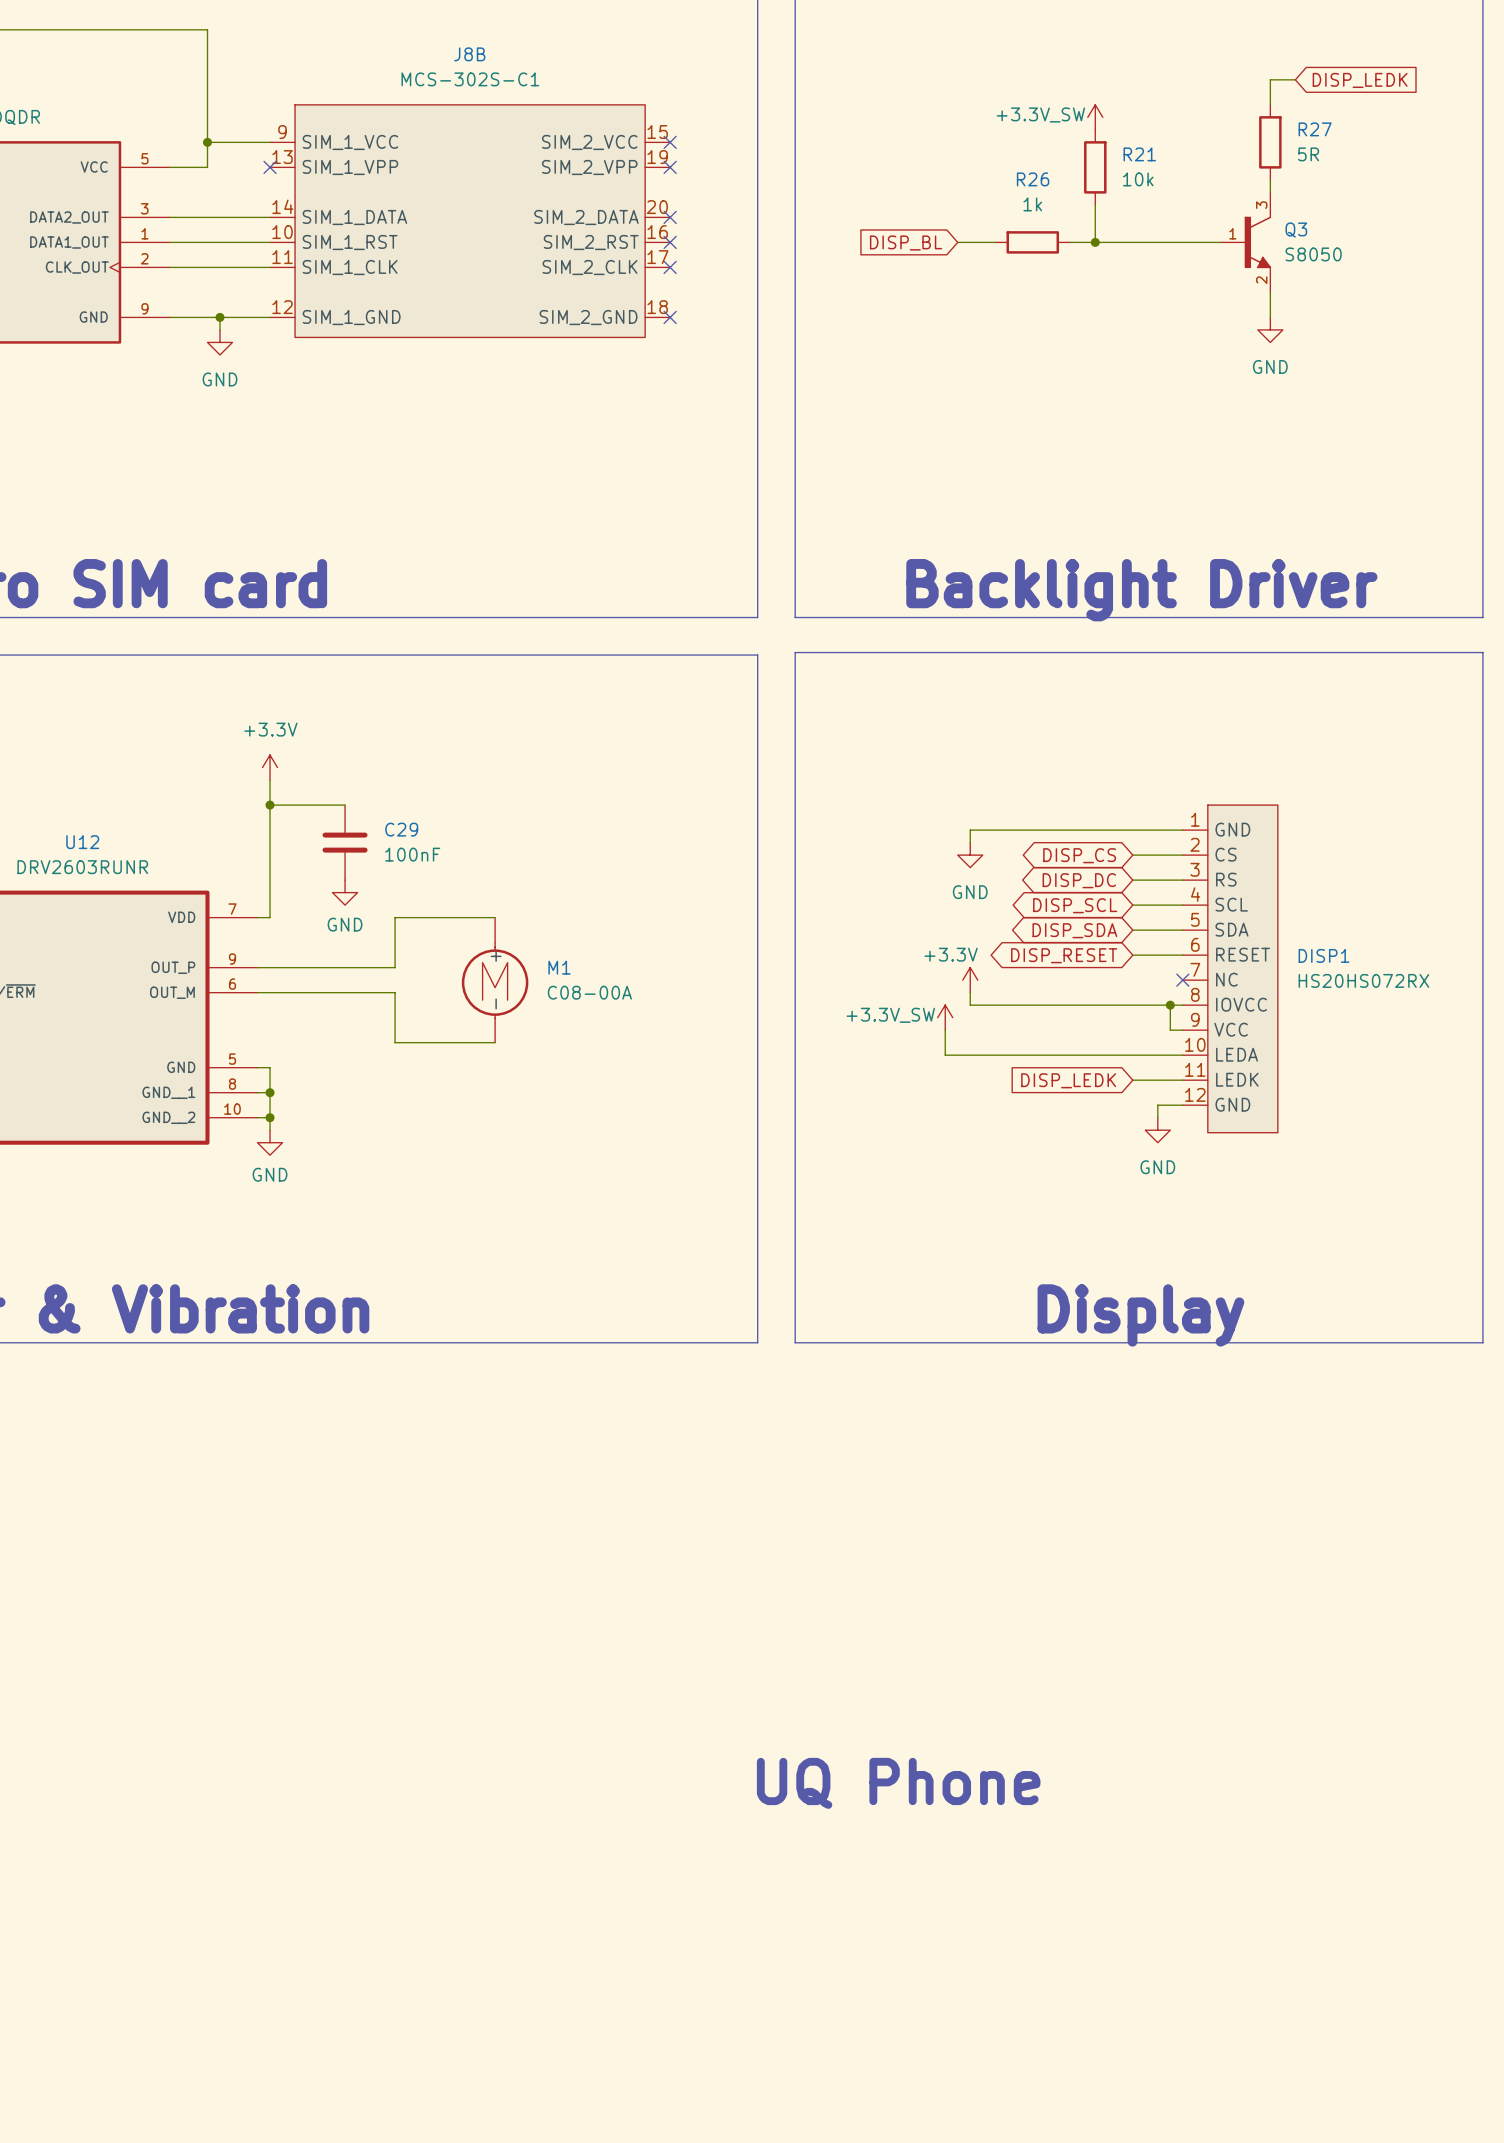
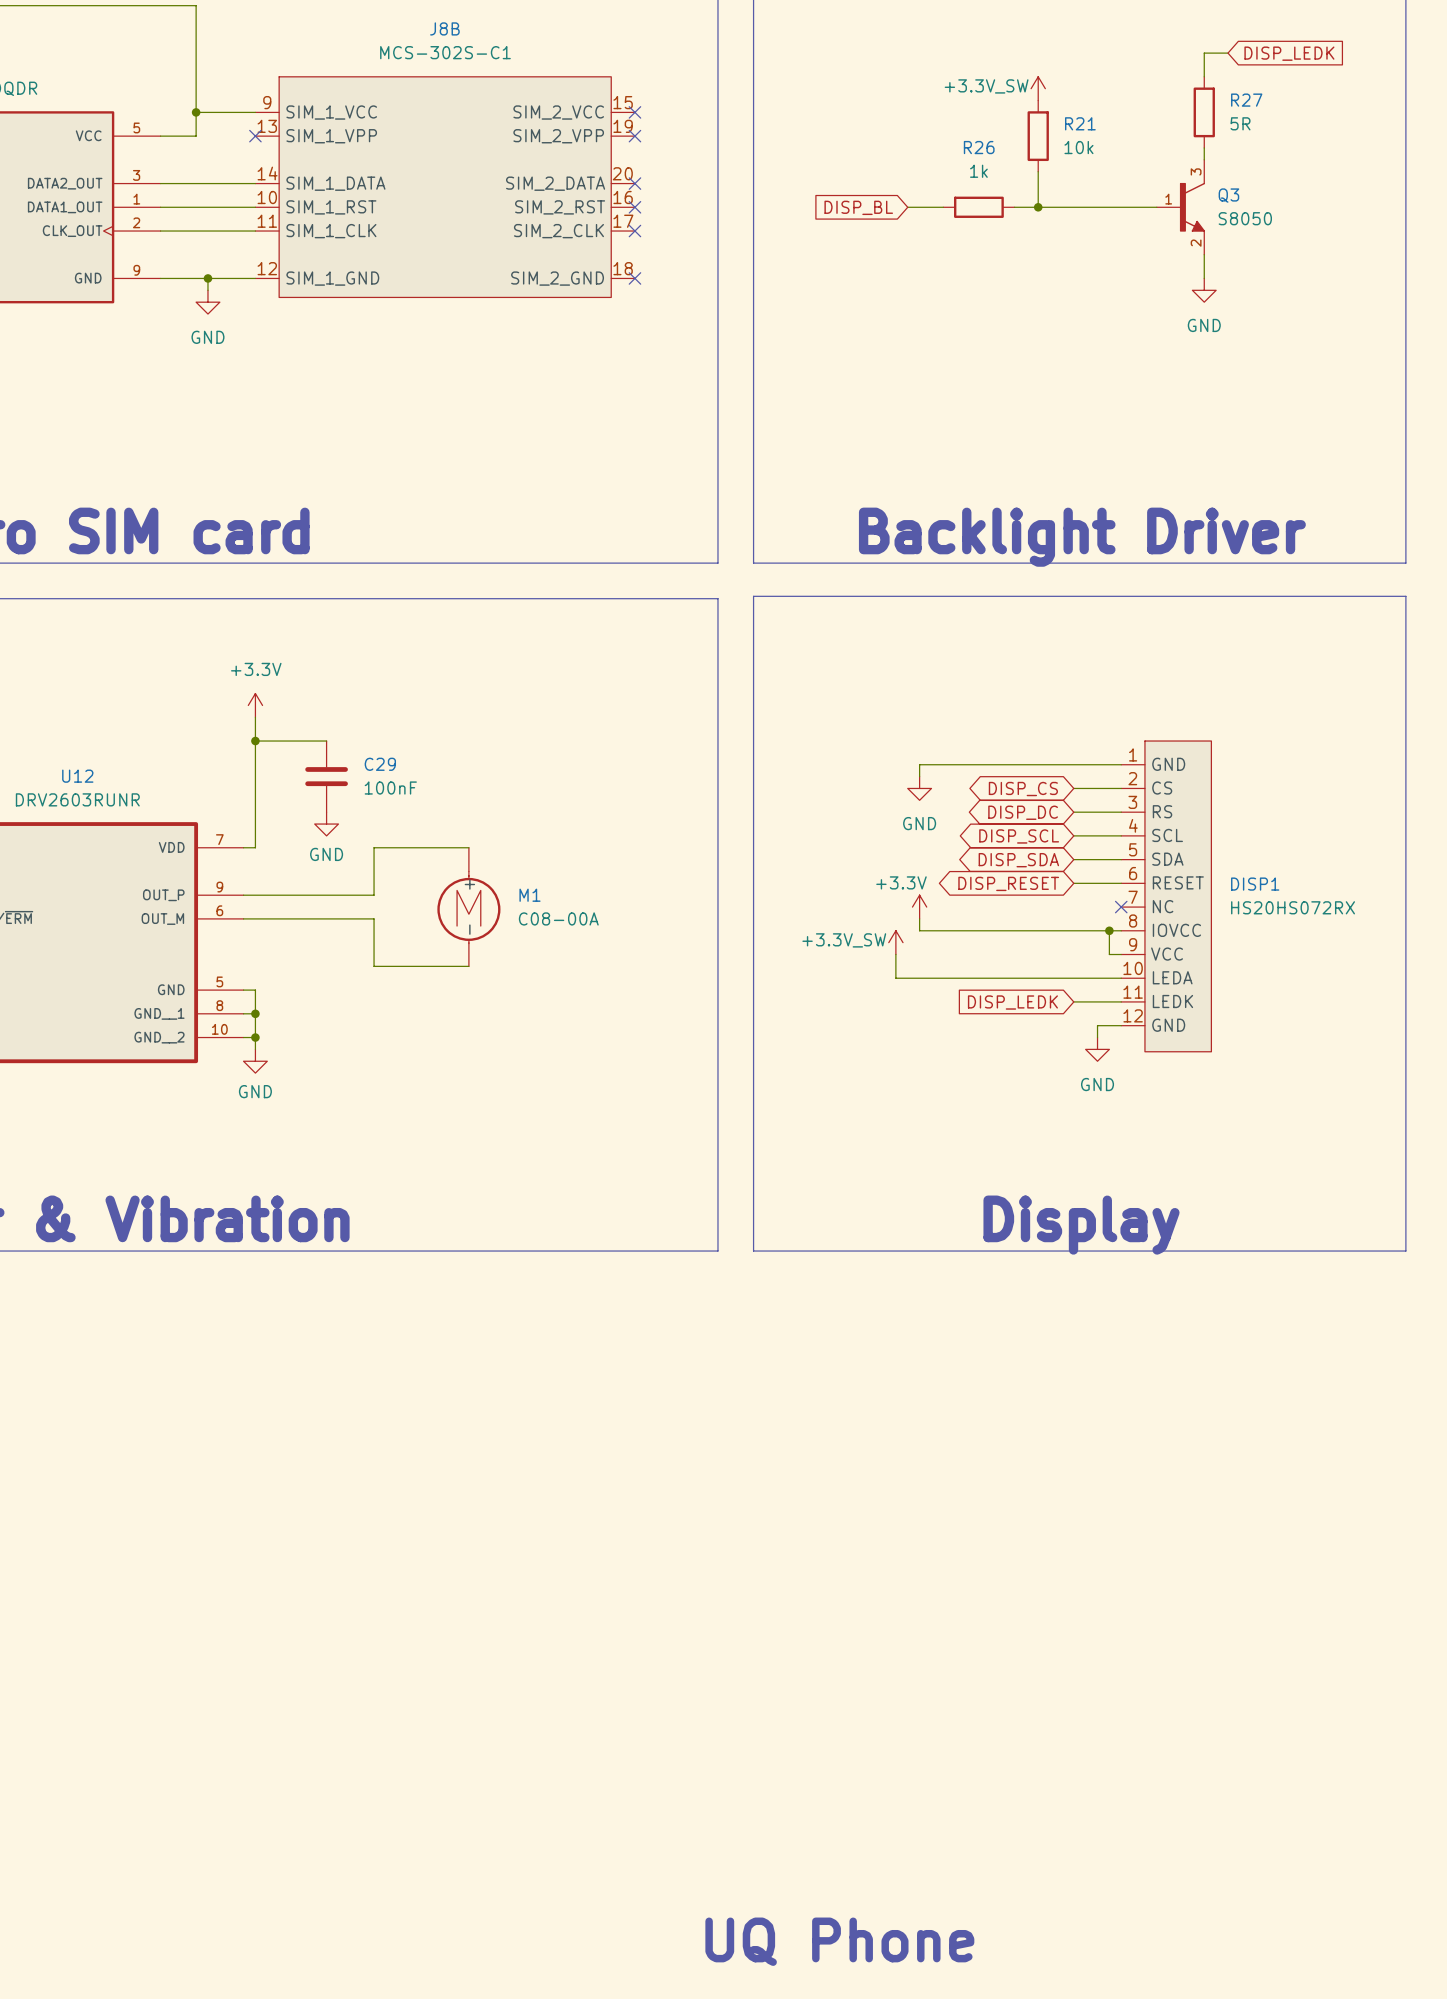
text: UQ Phone (898, 1783) -> none
text: none -> UQ Phone (839, 1941)

